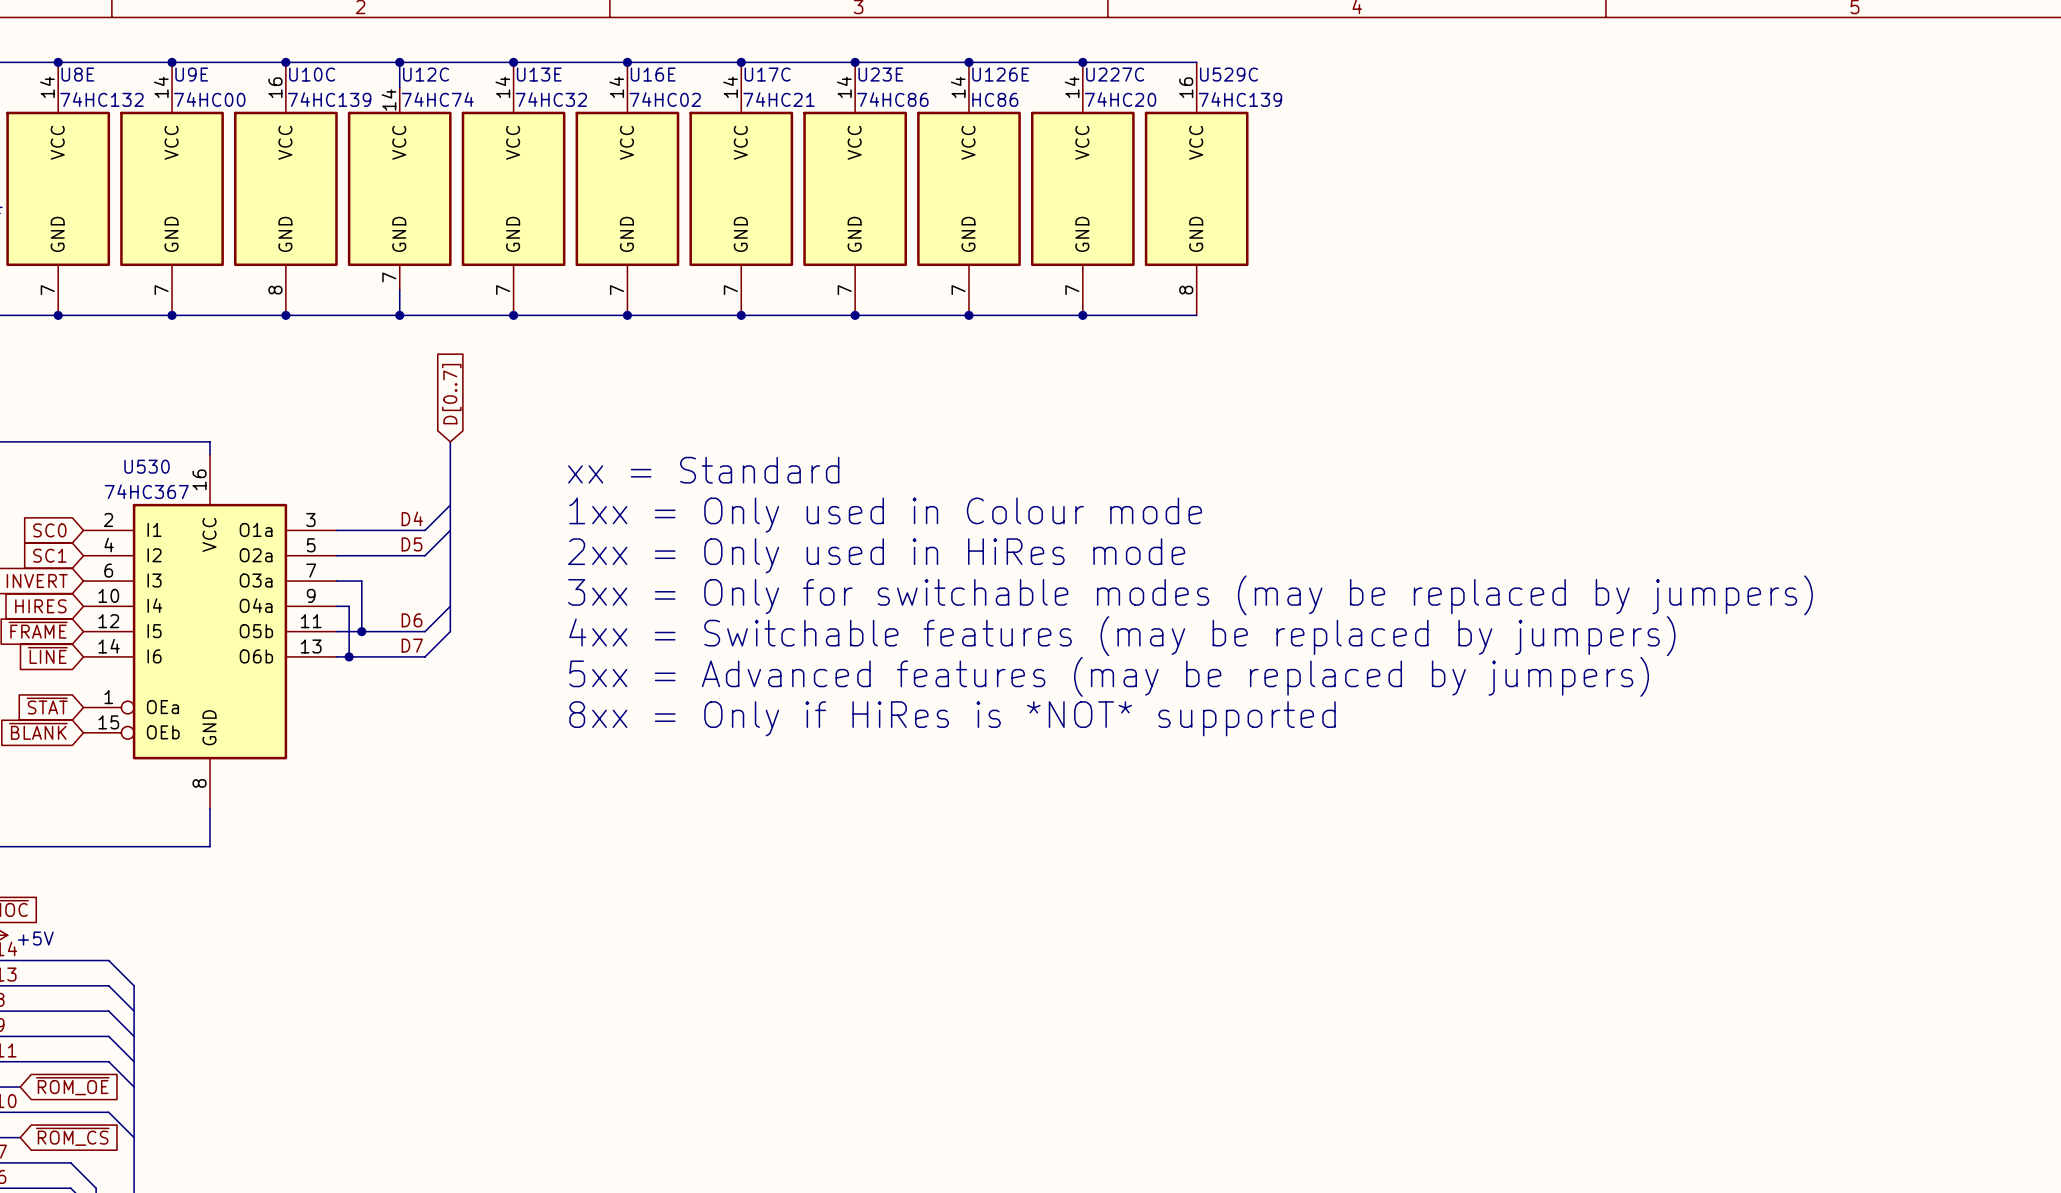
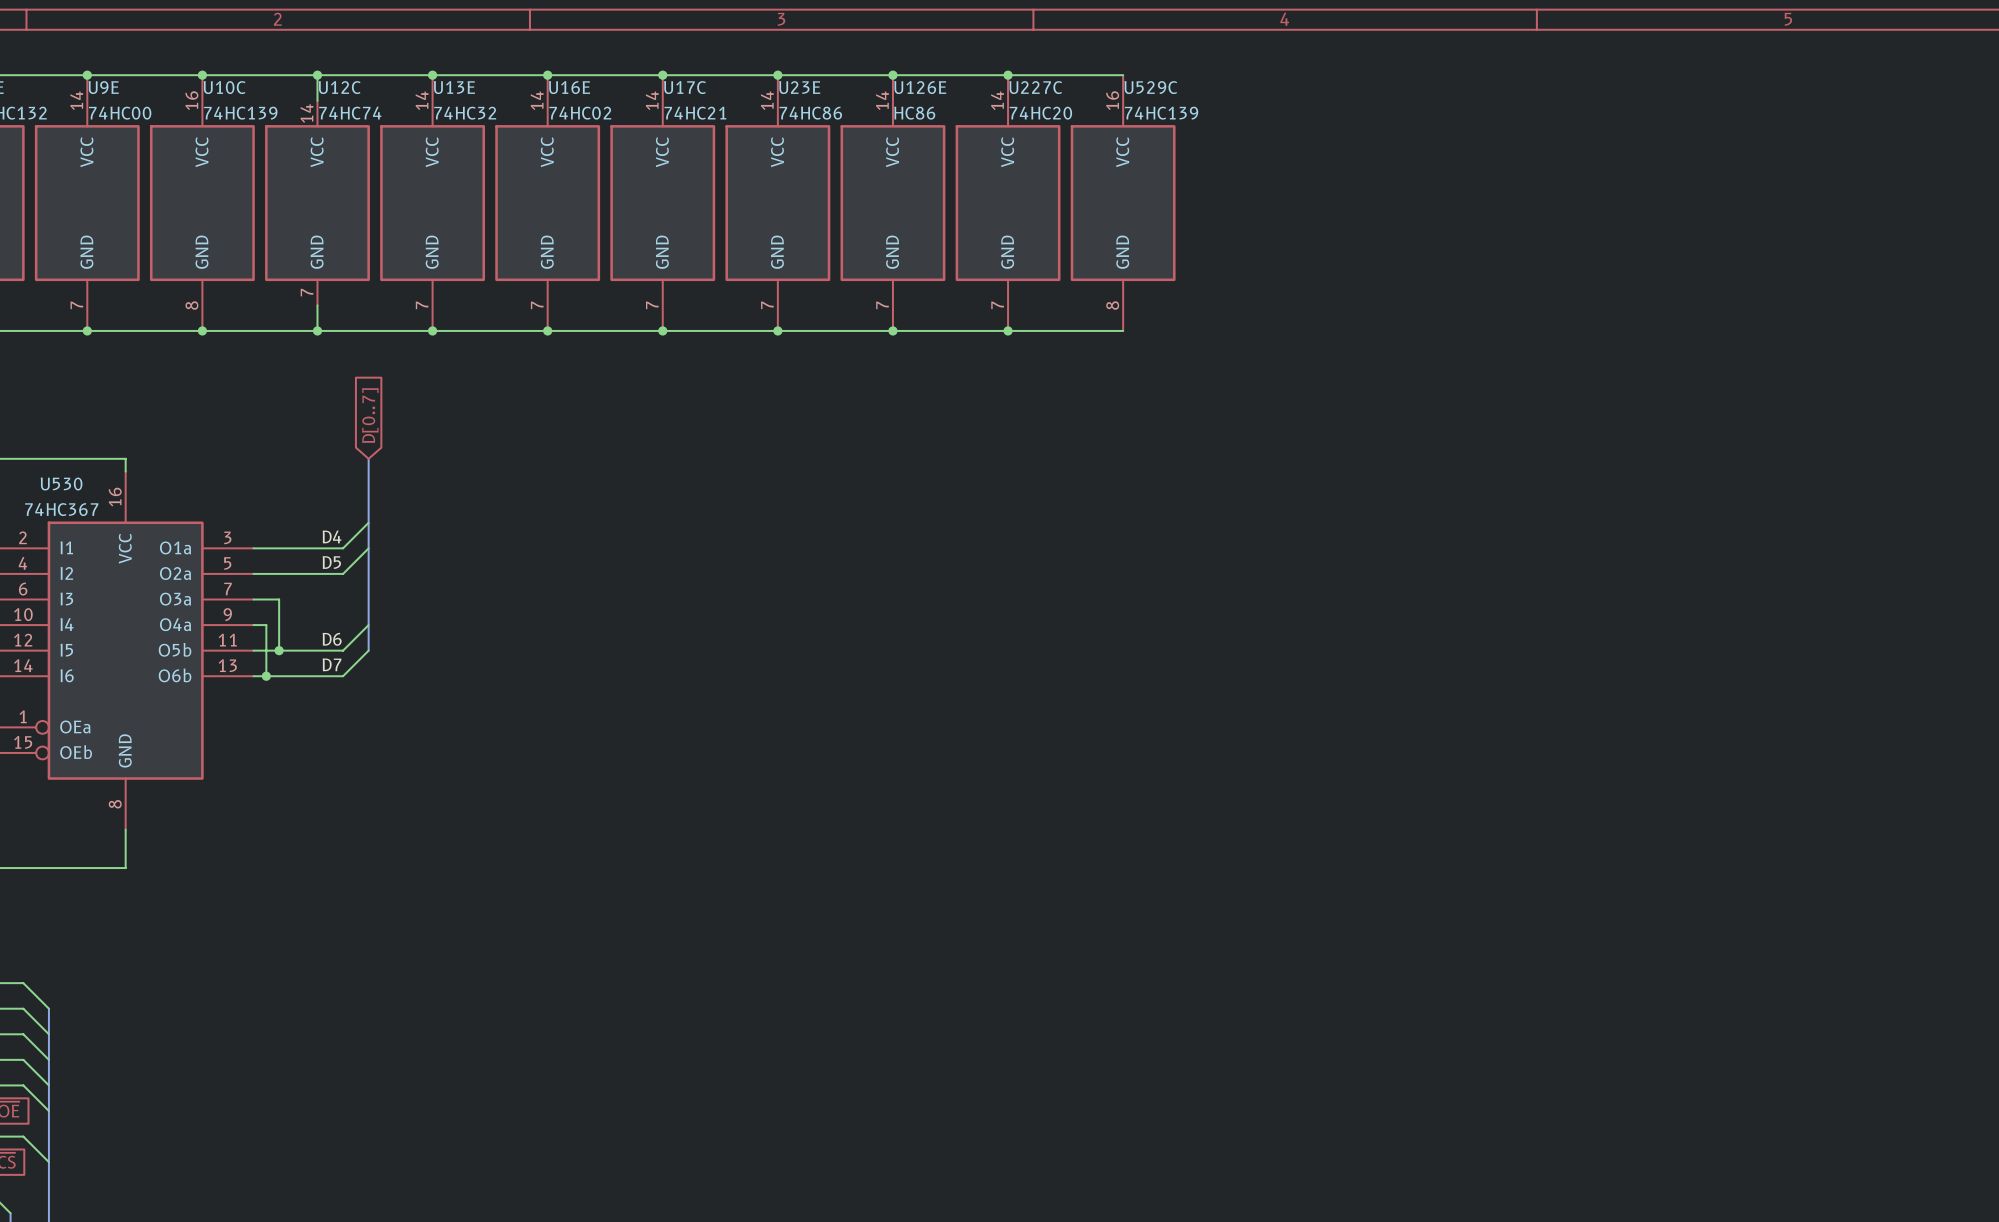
text: xx = Standard (703, 470) -> none
text: 1xx = Only used in Colour mode (885, 515) -> none
text: 2xx = Only used in HiRes mode (876, 555) -> none
text: 3xx = Only for switchable modes (may be replaced by jumpers) (1190, 595) -> none
text: 4xx = Switchable features (may be replaced by jumpers) (1122, 636) -> none
text: 5xx = Advanced features (may be replaced by jumpers) (1109, 676) -> none
text: 8xx = Only if HiRes is *NOT* supported (952, 718) -> none

